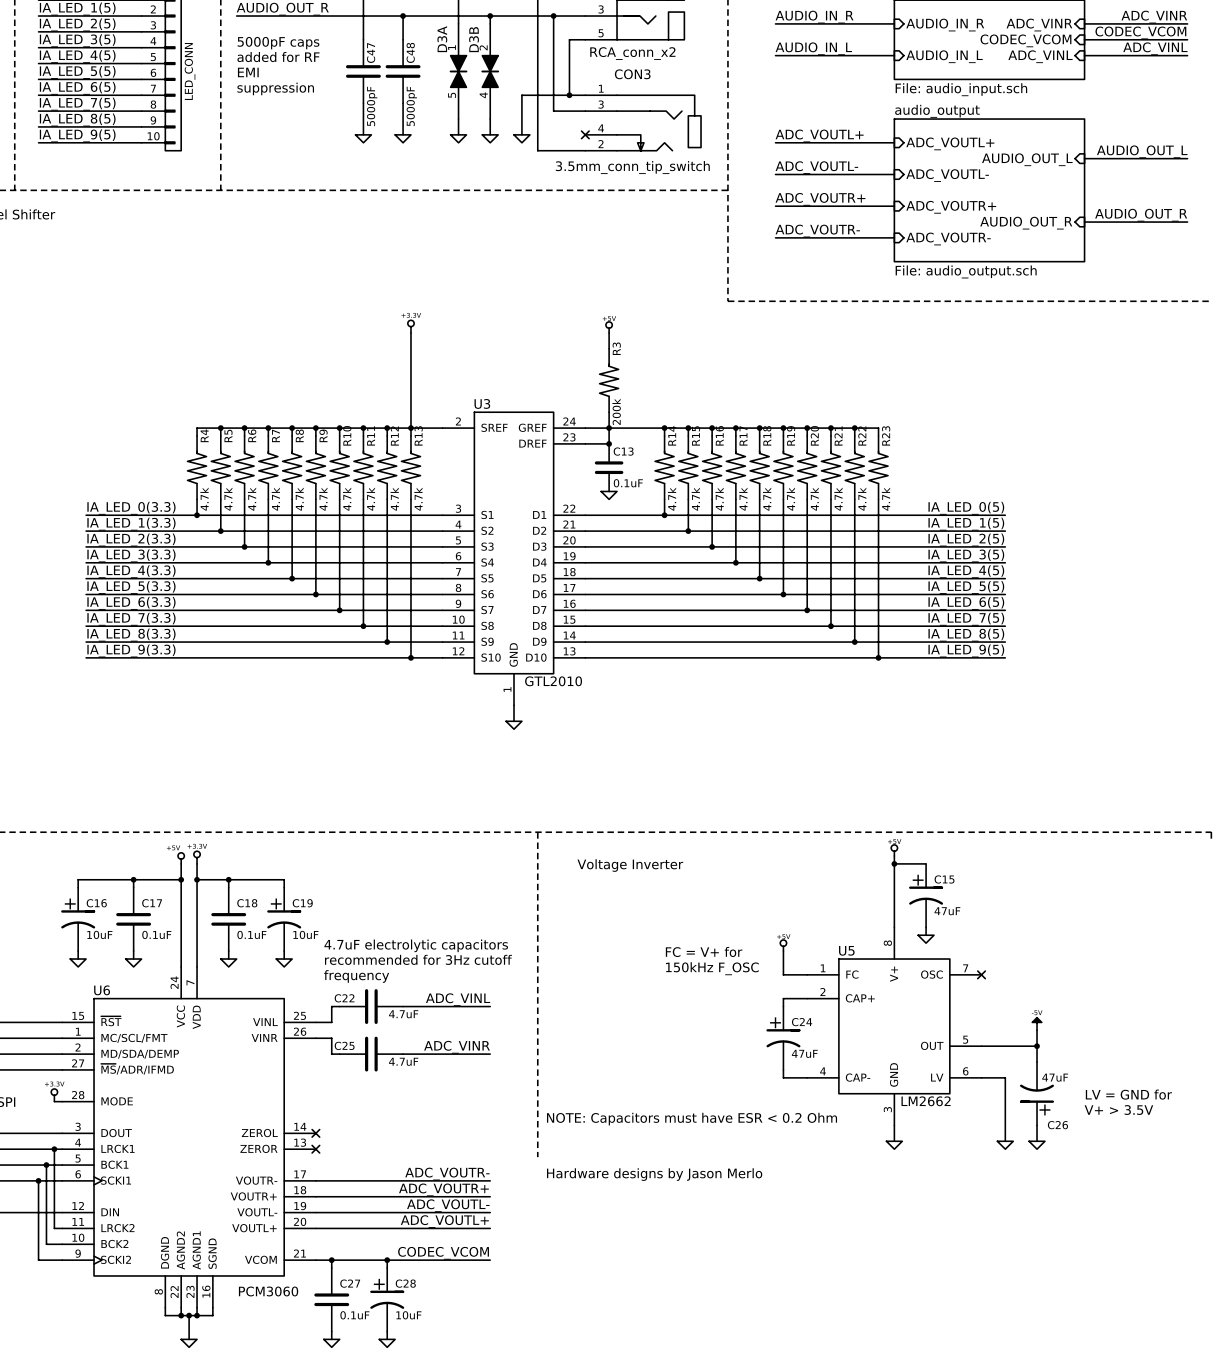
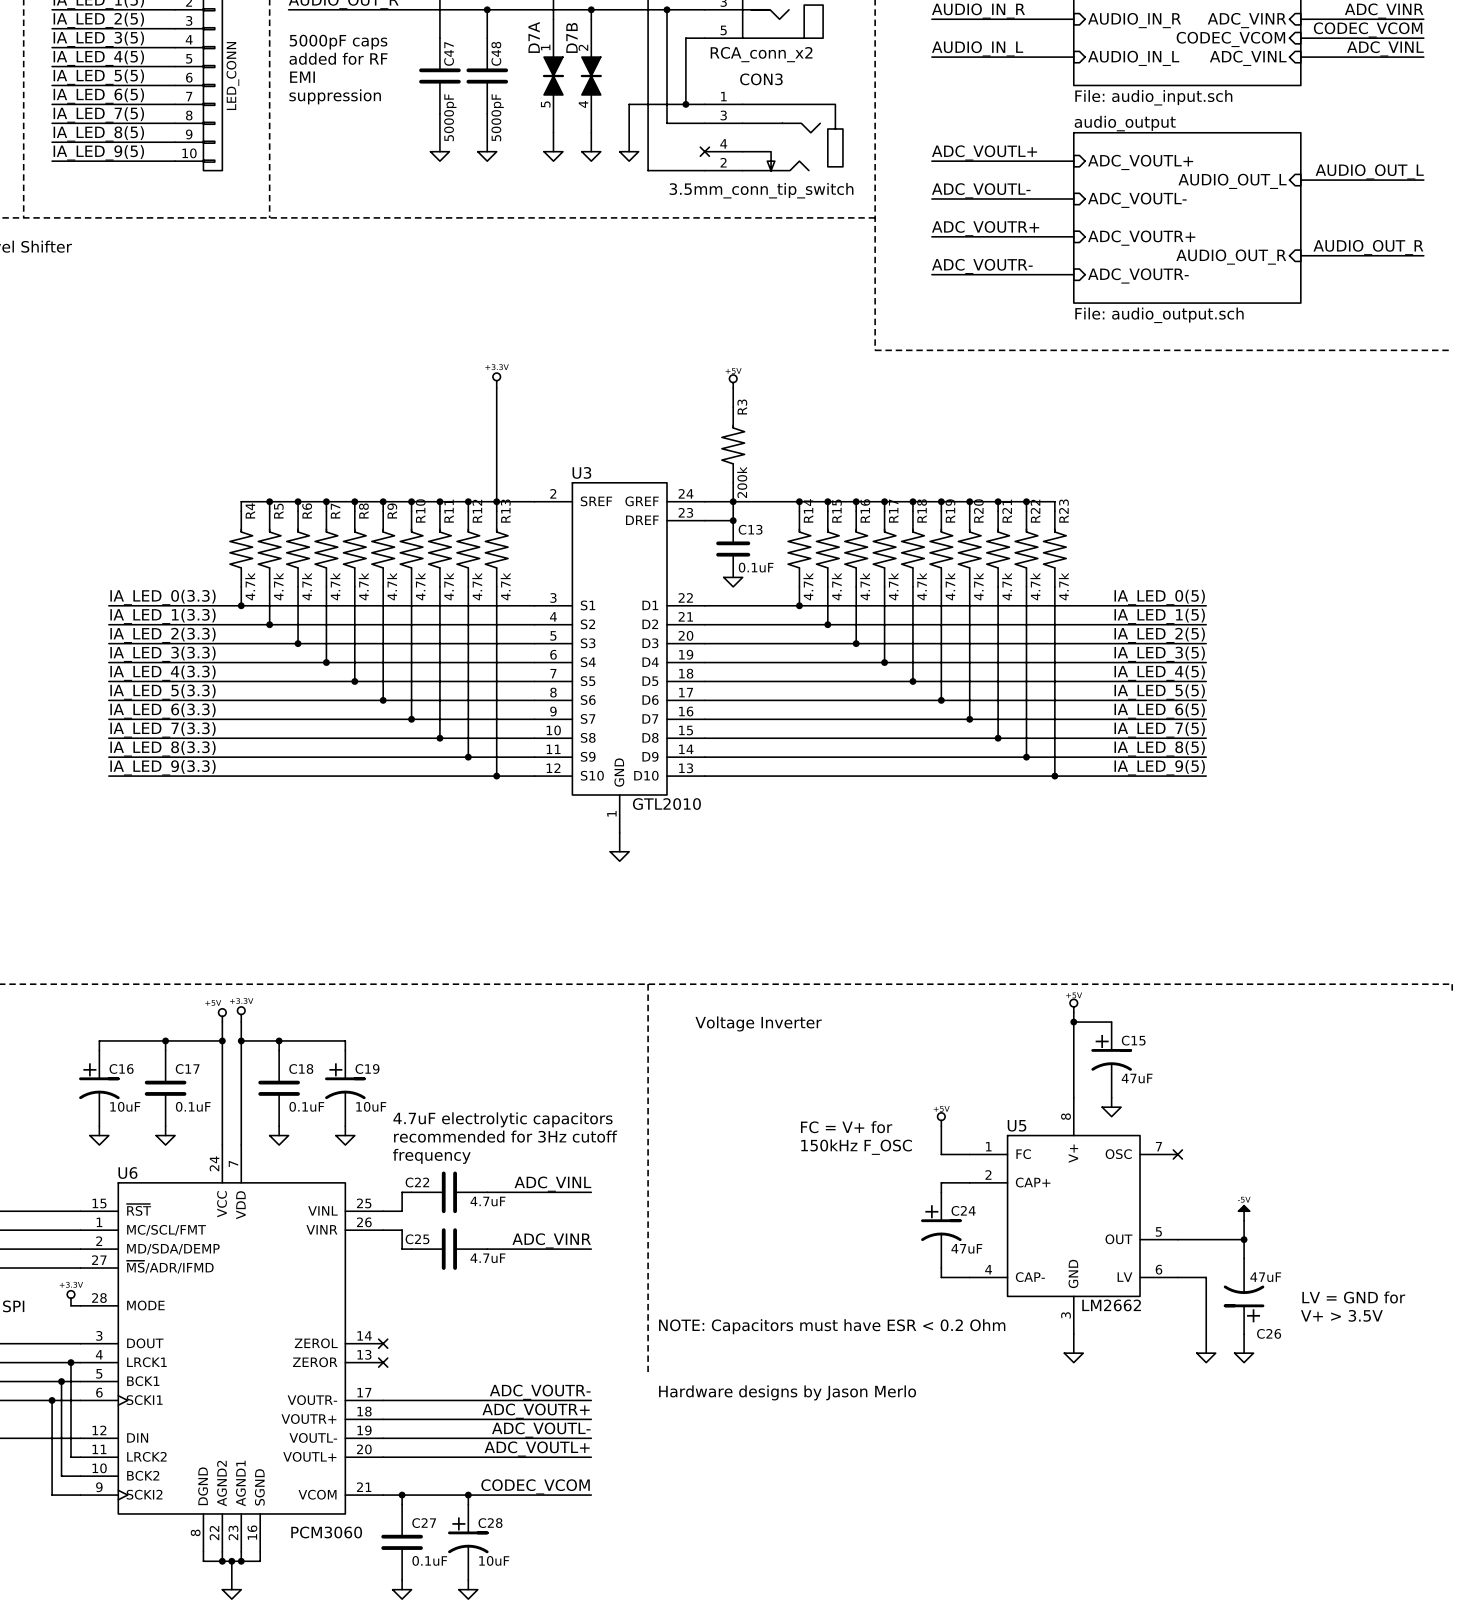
D3A name: D3A (442, 39) -> D7A (534, 37)
D3B name: D3B (474, 39) -> D7B (571, 37)

